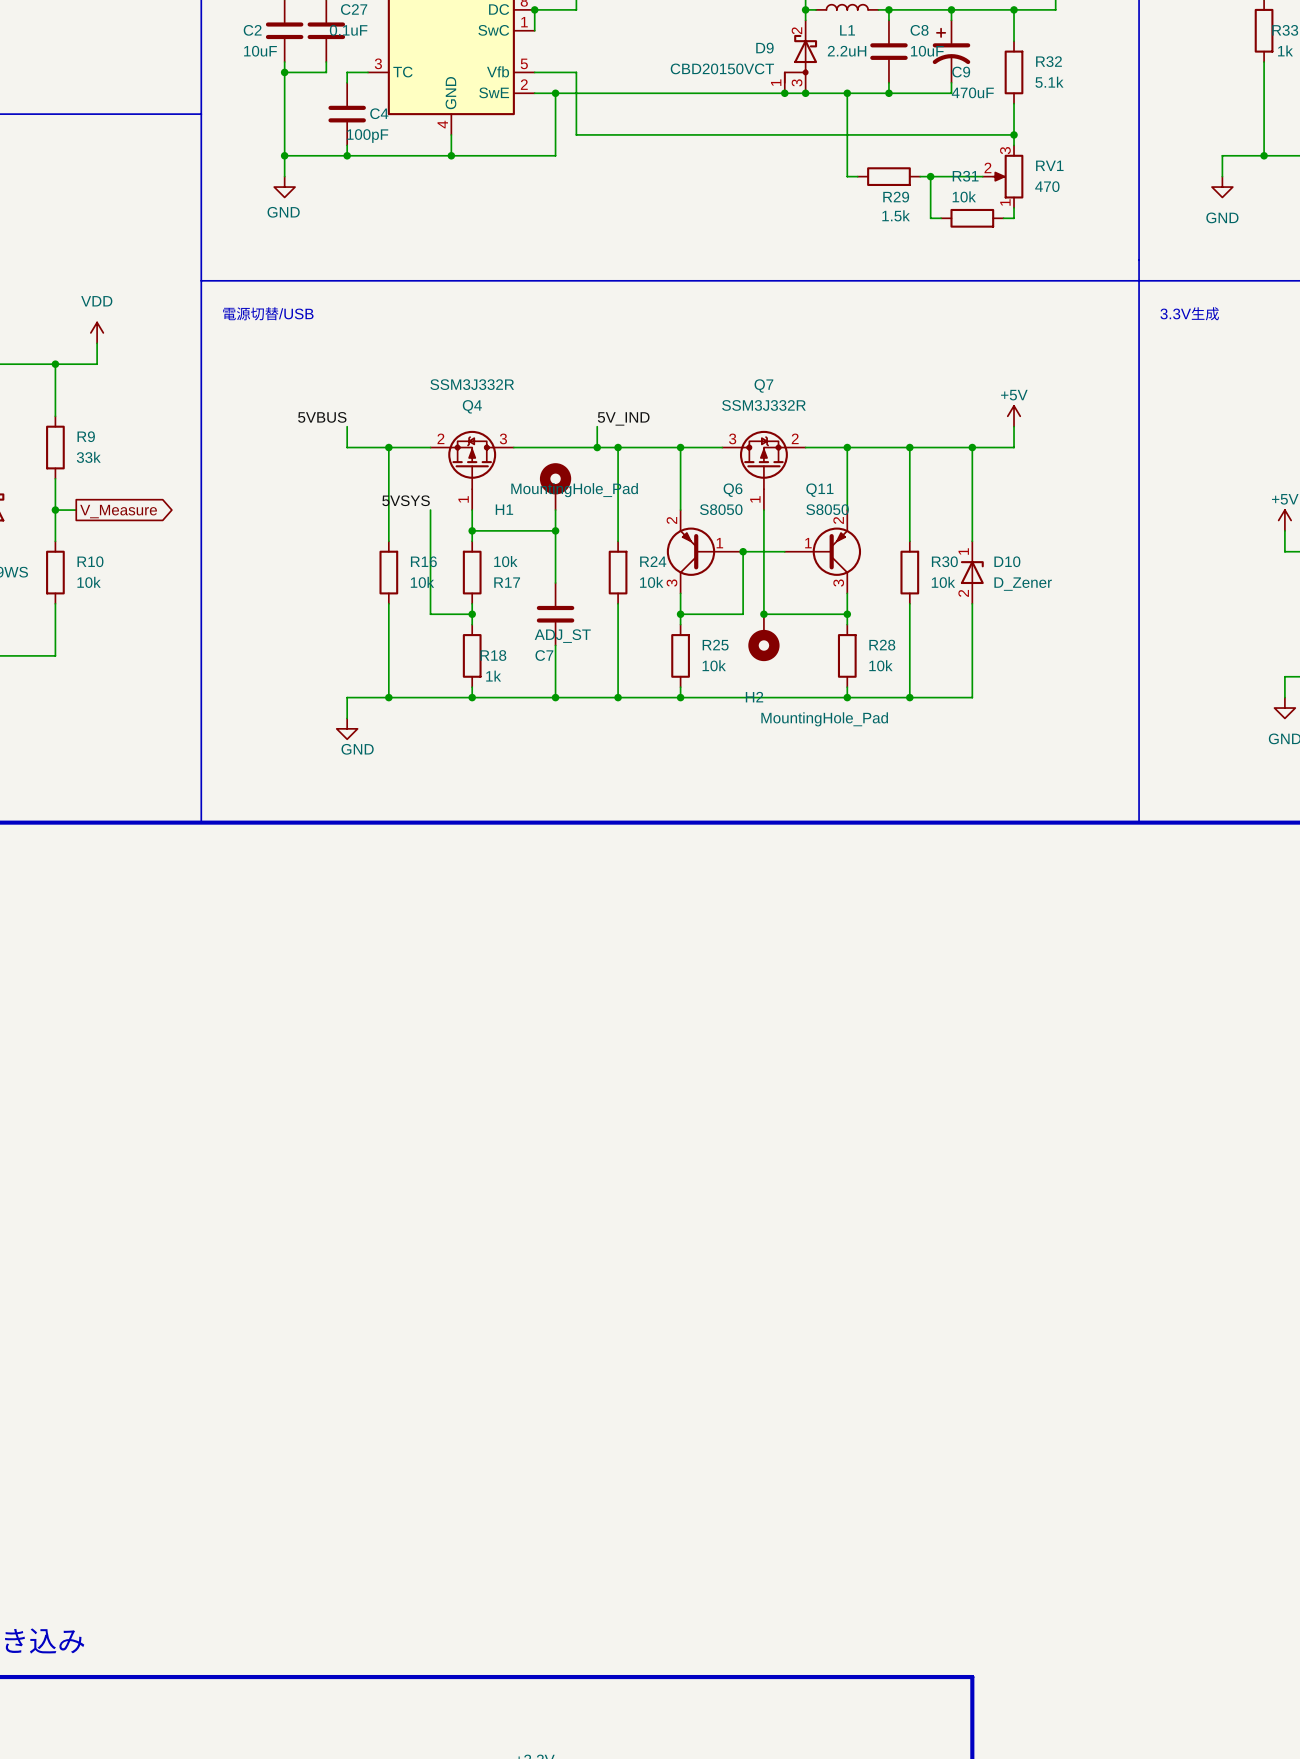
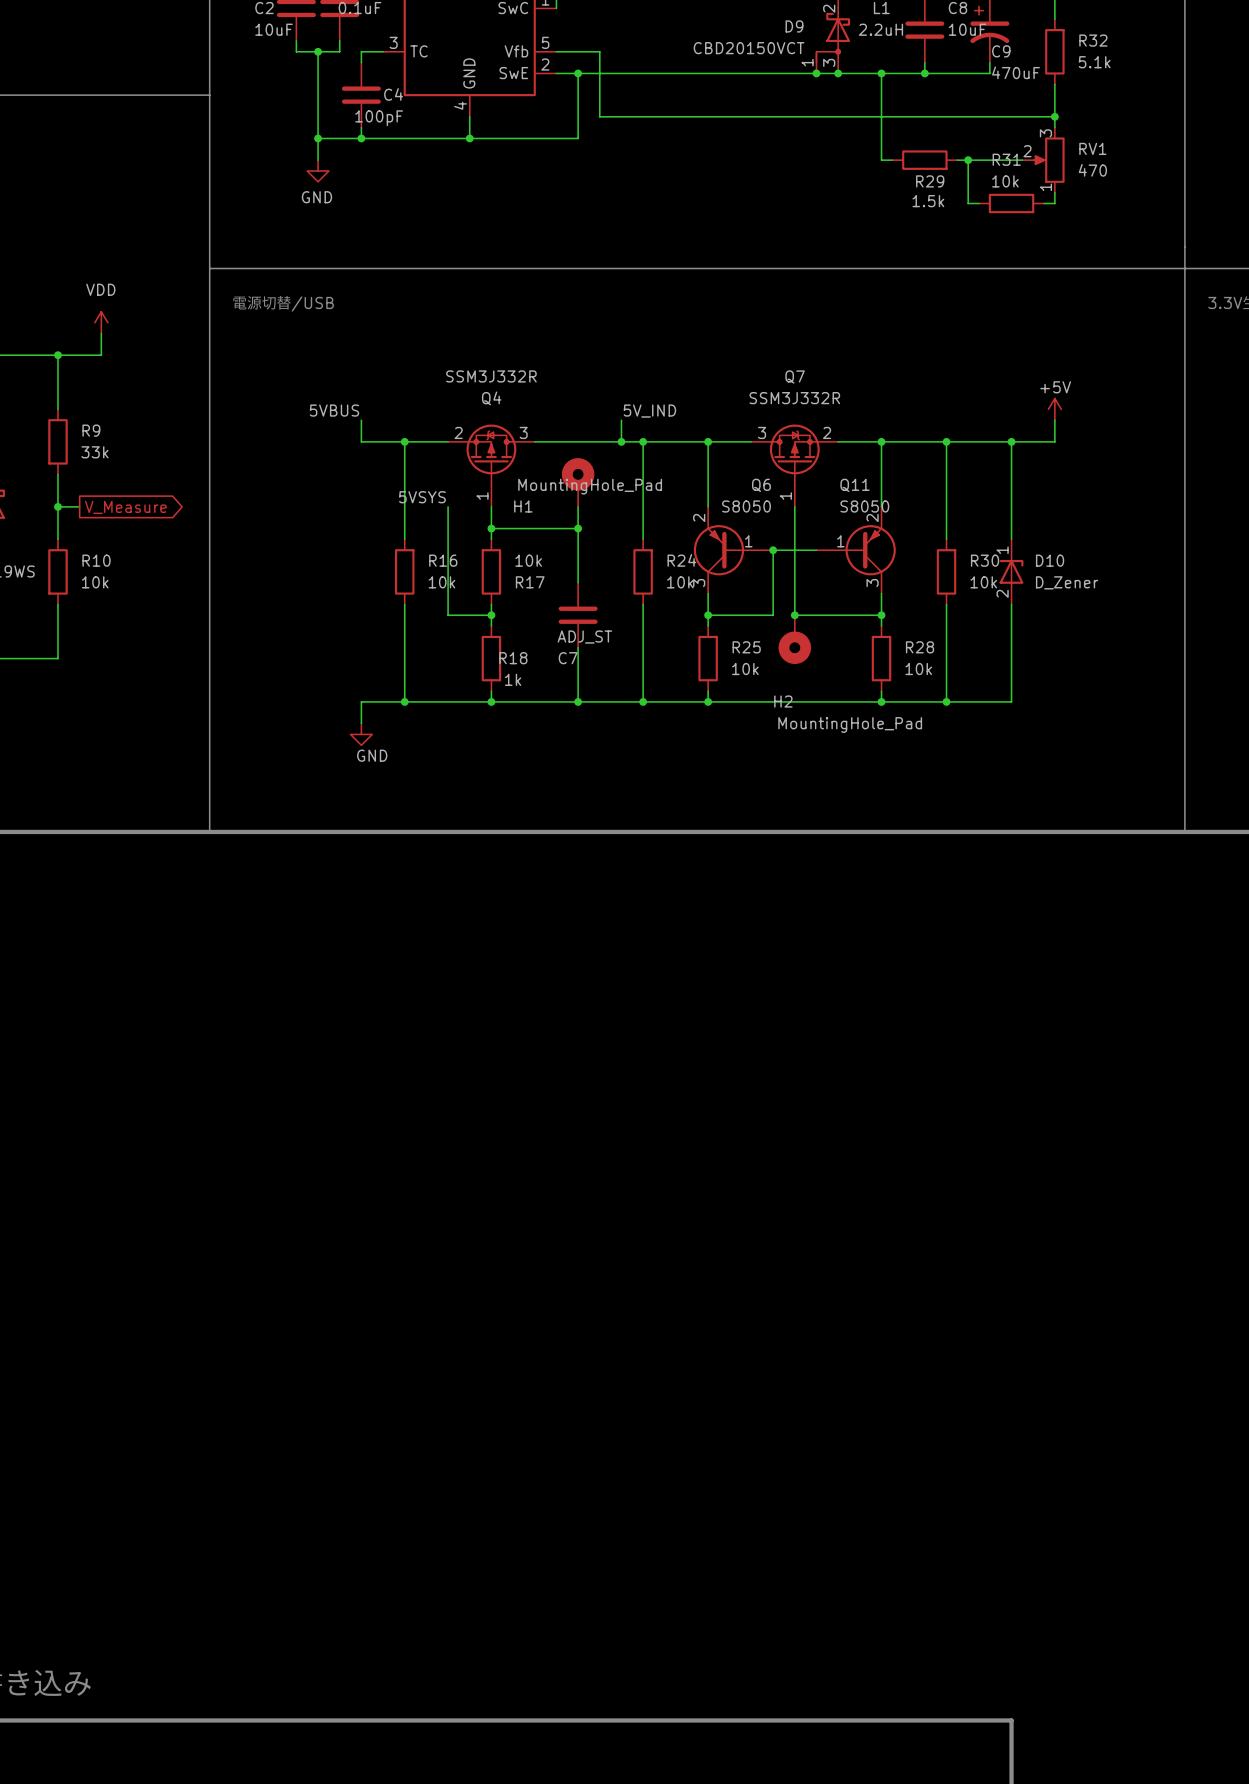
wire: (284, 72) (284, 176) -> (318, 51) (318, 160)
junction position: (284, 72) -> (318, 51)
wire: (284, 155) (305, 155) -> none
junction position: (284, 155) -> (318, 138)
power symbol position: GND (284, 187) -> GND (318, 170)

